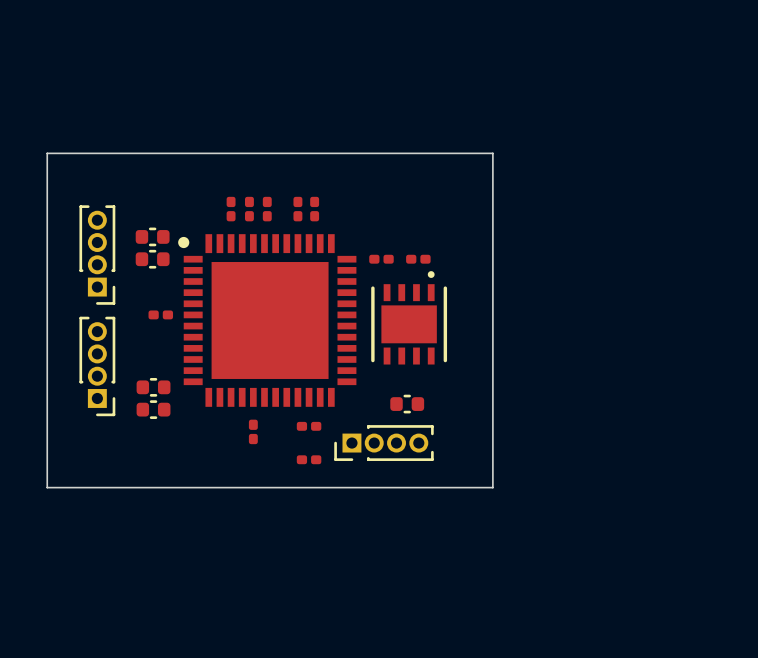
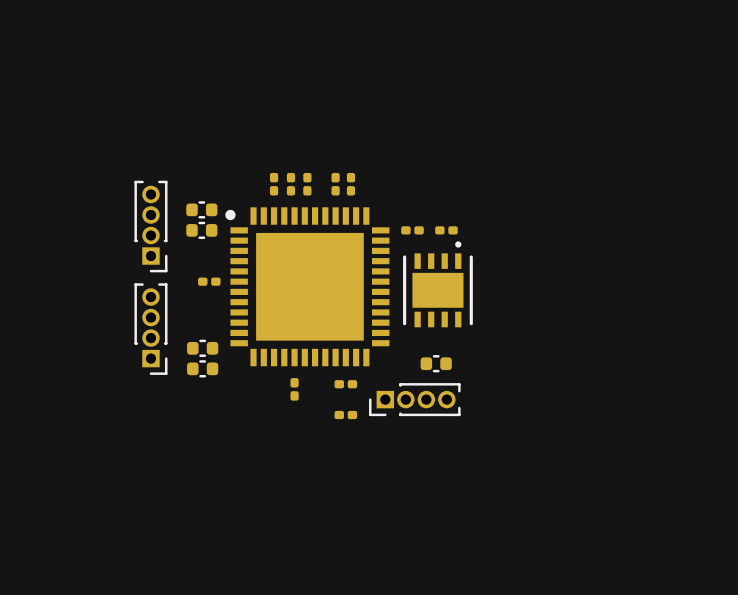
board edge: (47, 153) (492, 153) (492, 487) (47, 487) (47, 153) -> none

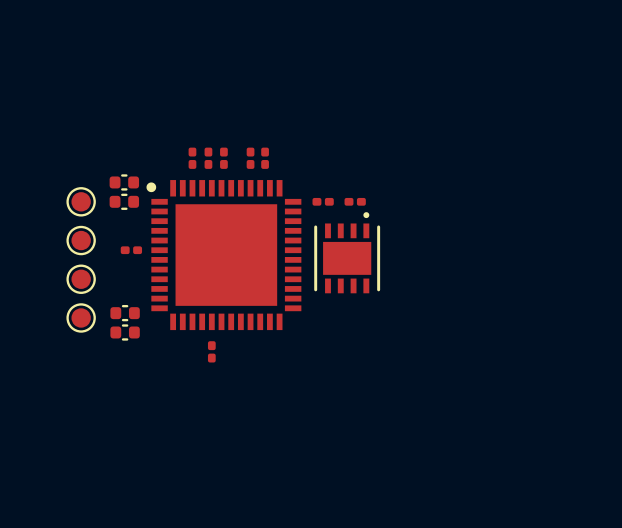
part footprint: [134, 180, 168, 273] -> [66, 187, 96, 217]
part: none -> (81, 240)
part: none -> (81, 279)
part: (150, 329) -> none
part: none -> (81, 317)
part: (436, 363) -> none
part: (345, 384) -> none
part: (414, 399) -> none
part: (345, 414) -> none

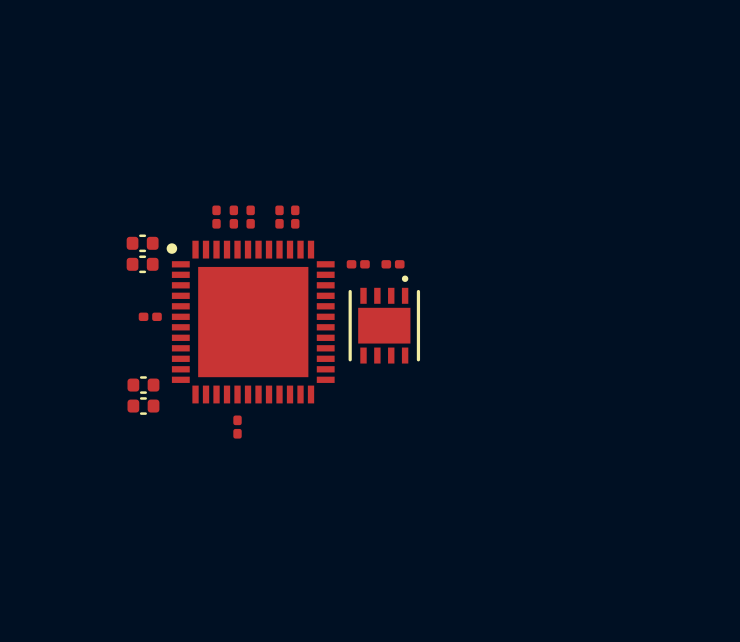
part: (81, 201) -> none
part: (81, 240) -> none
part: (81, 279) -> none
part: (81, 317) -> none

